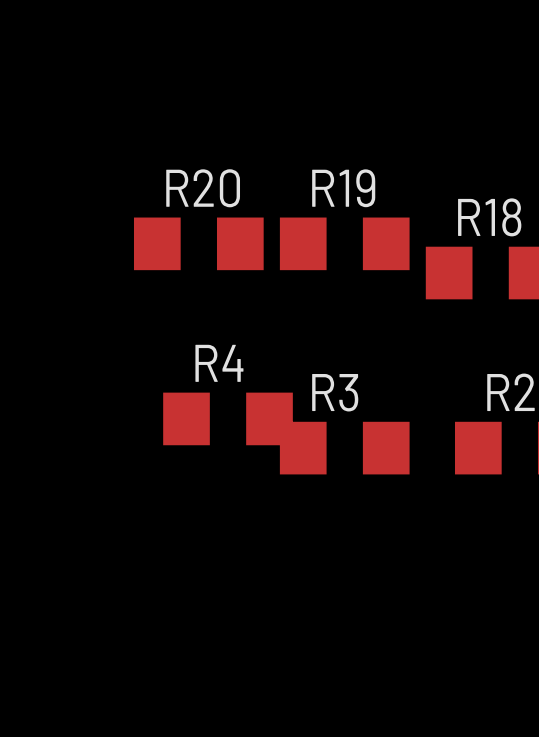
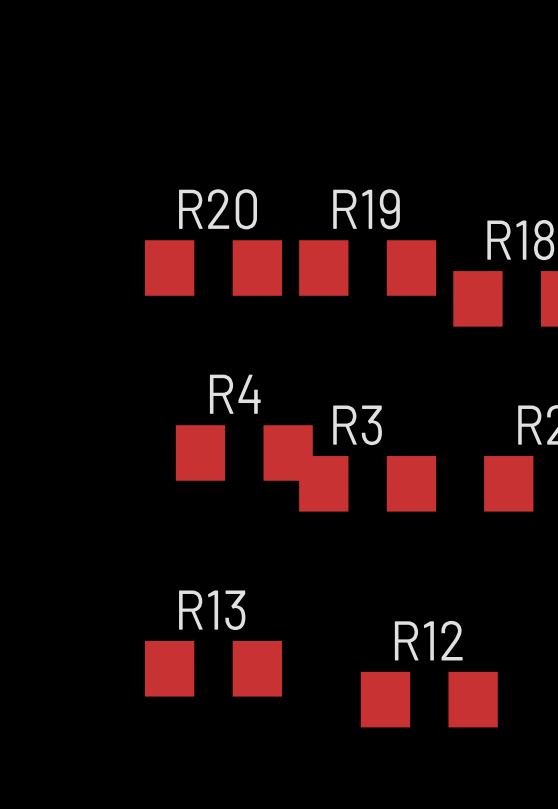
R13: none -> (213, 668)
R12: none -> (429, 699)

